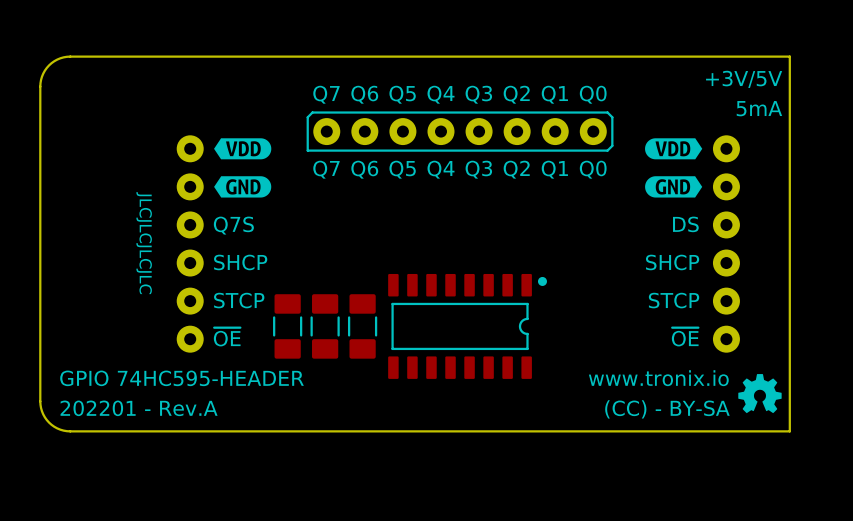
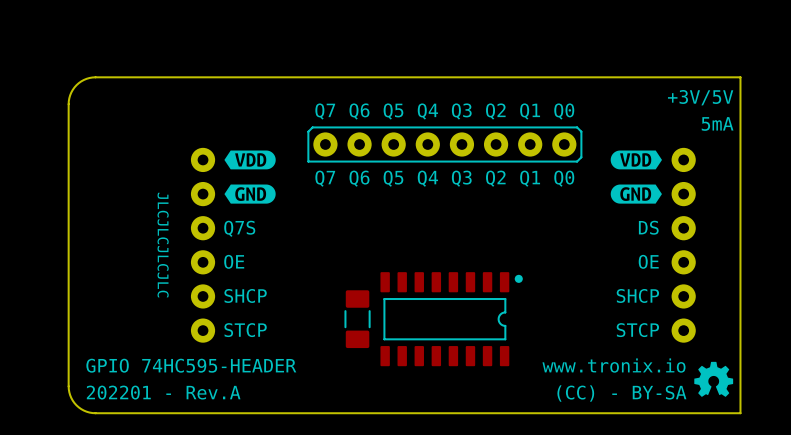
text: SHCP (240, 262) -> OE (234, 261)
text: SHCP (672, 262) -> OE (648, 261)
text: STCP (239, 300) -> SHCP (245, 295)
text: STCP (674, 300) -> SHCP (637, 295)
part: (287, 326) -> none
part: (325, 326) -> none
text: ~{OE} (227, 337) -> STCP (245, 330)
text: ~{OE} (685, 337) -> STCP (637, 330)

